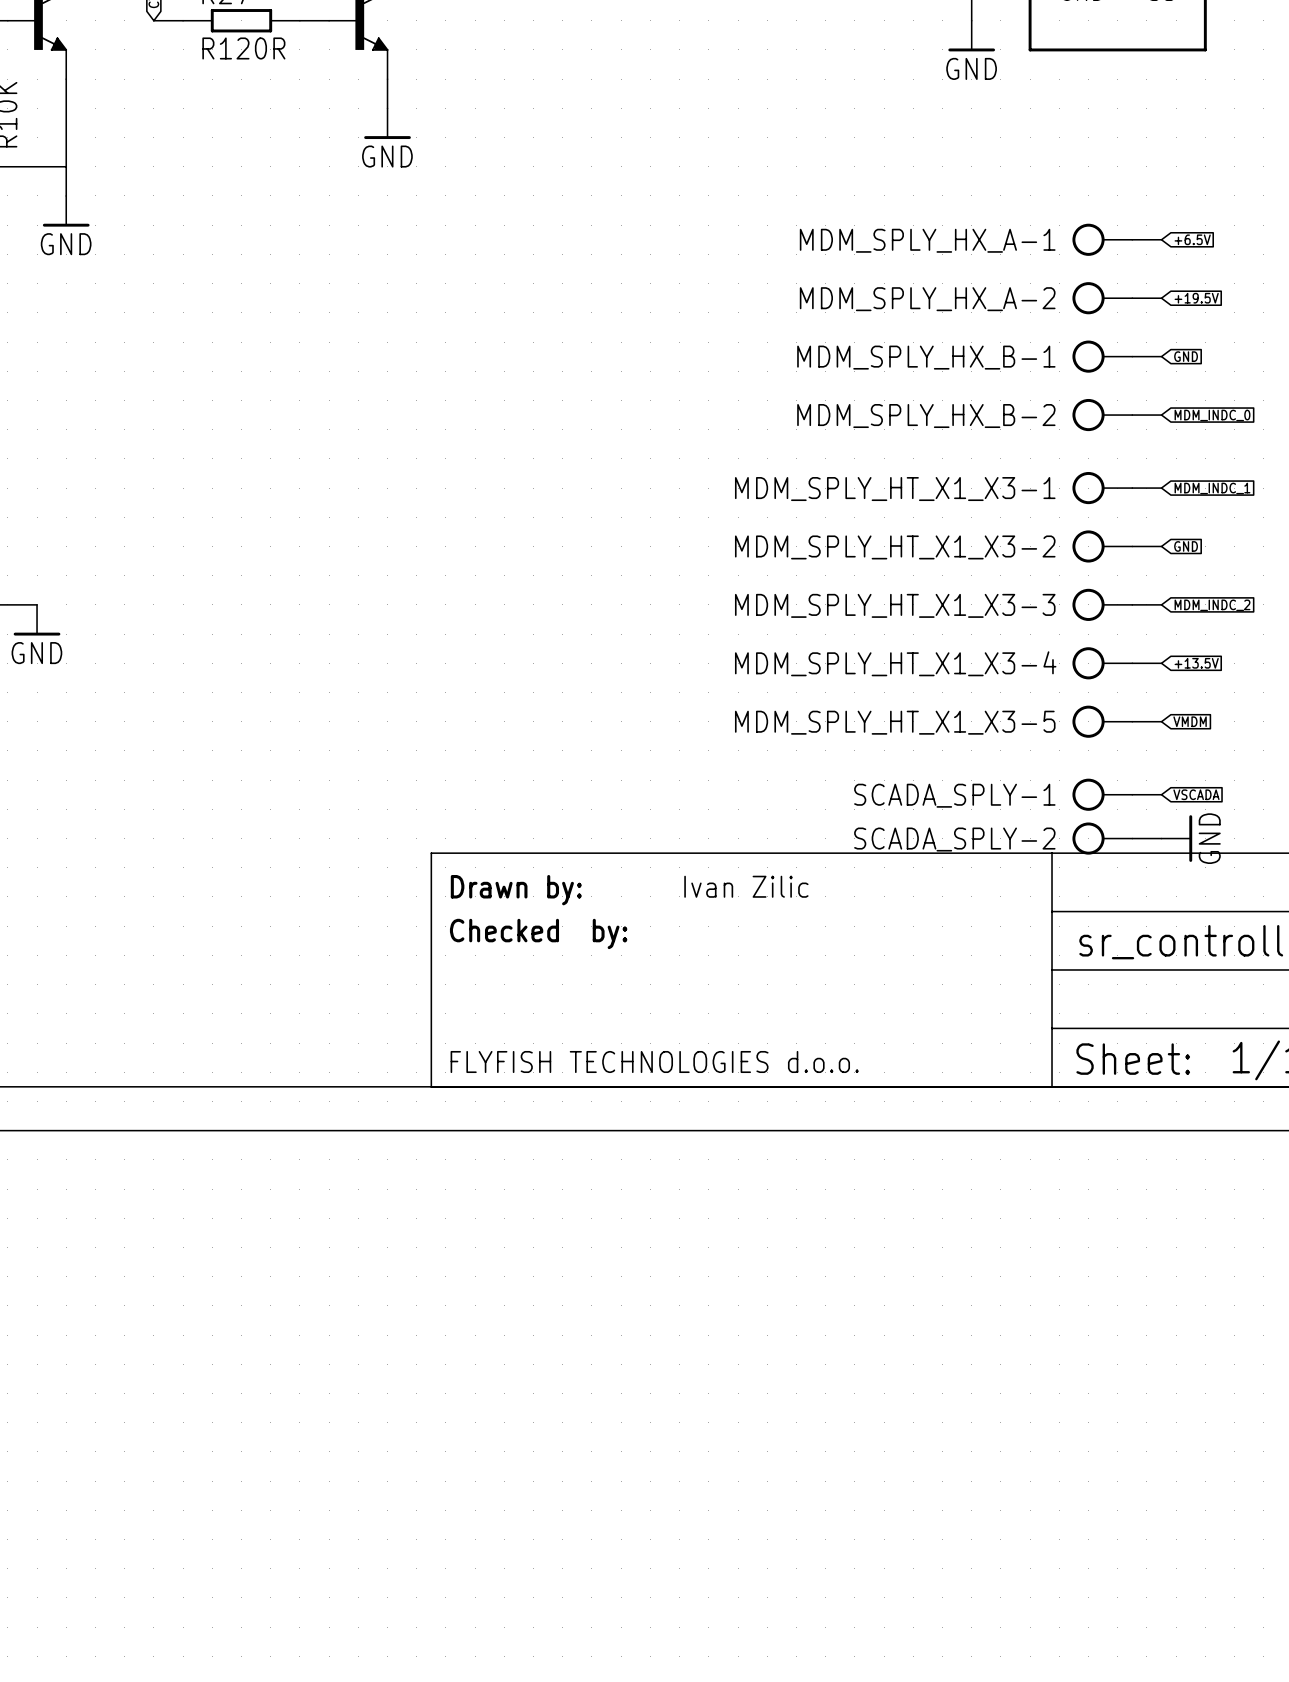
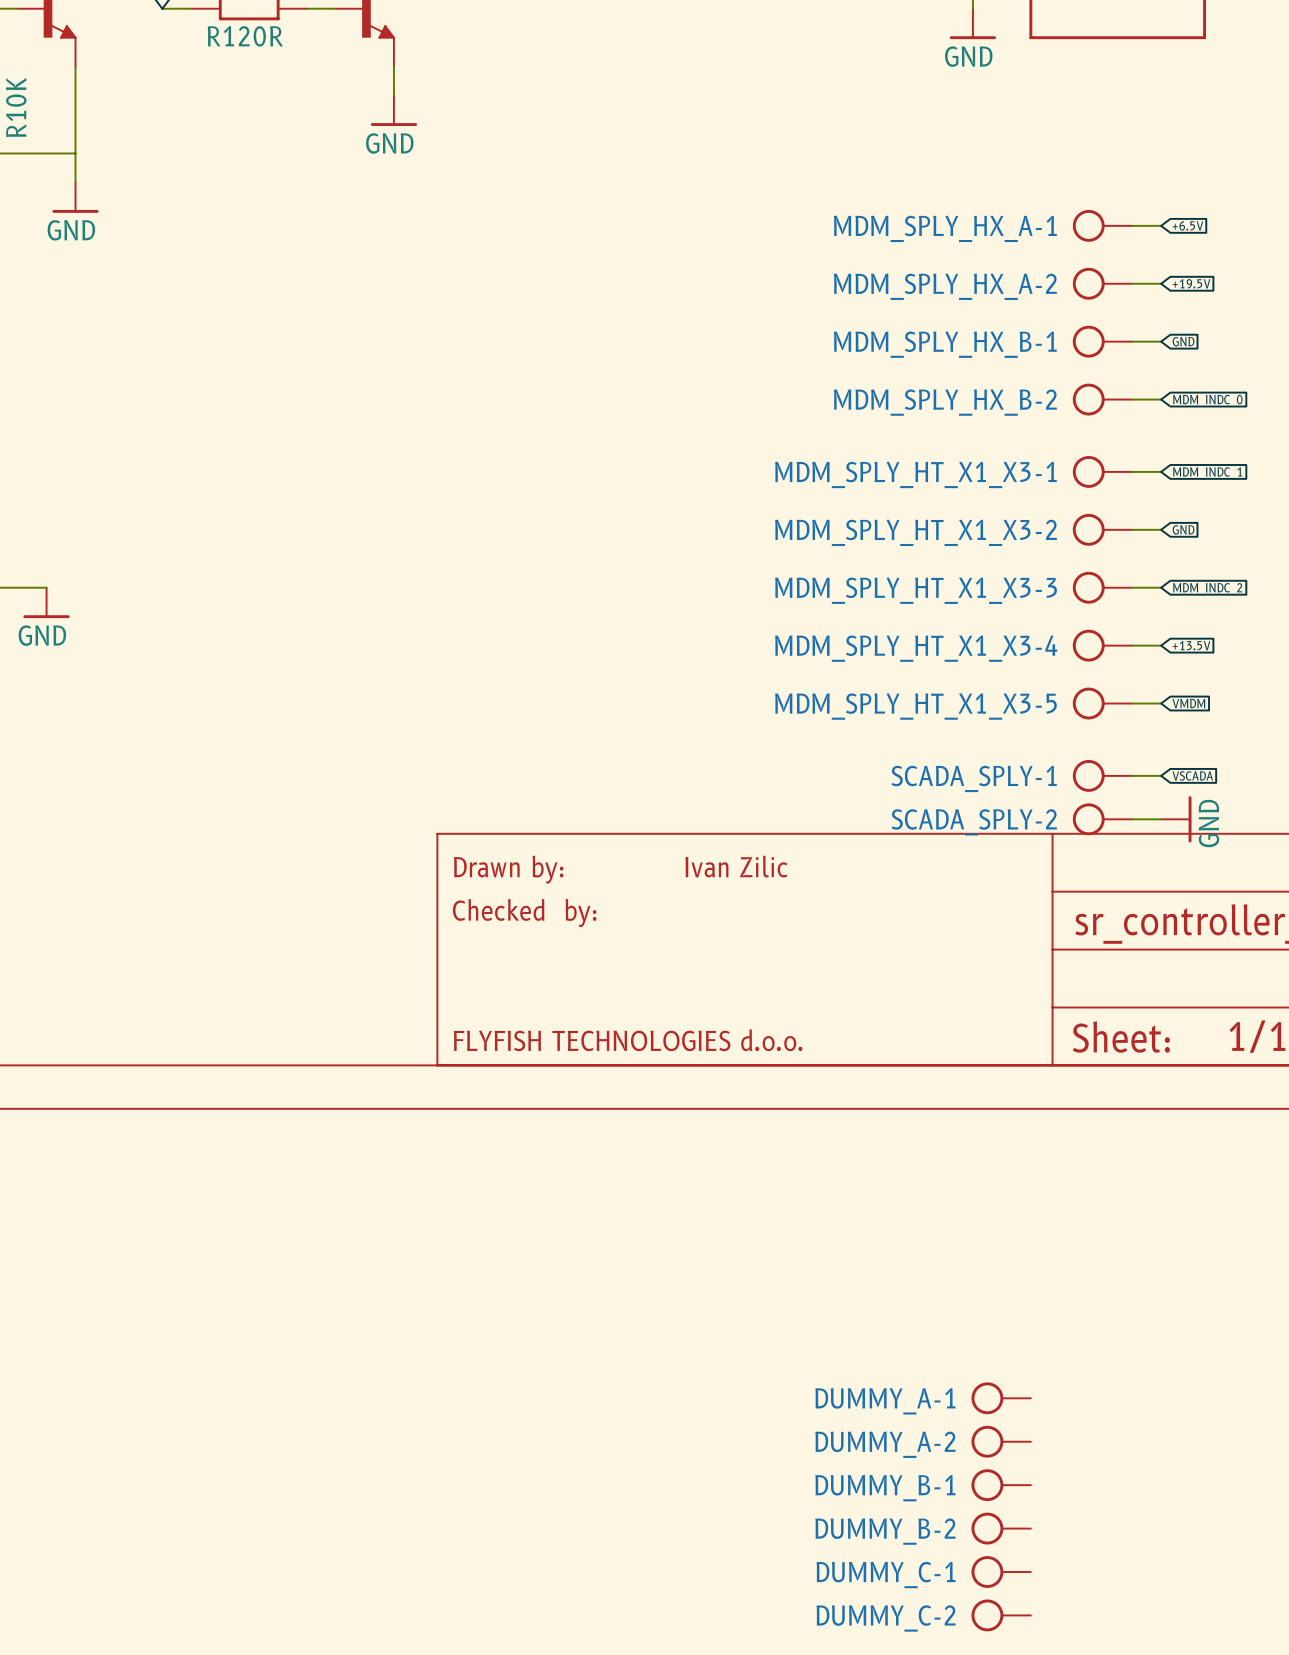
DUMMY_A-1: none -> (1001, 1398)
DUMMY_A-2: none -> (1001, 1441)
DUMMY_B-1: none -> (1001, 1485)
DUMMY_B-2: none -> (1001, 1528)
DUMMY_C-1: none -> (1001, 1572)
DUMMY_C-2: none -> (1001, 1615)

